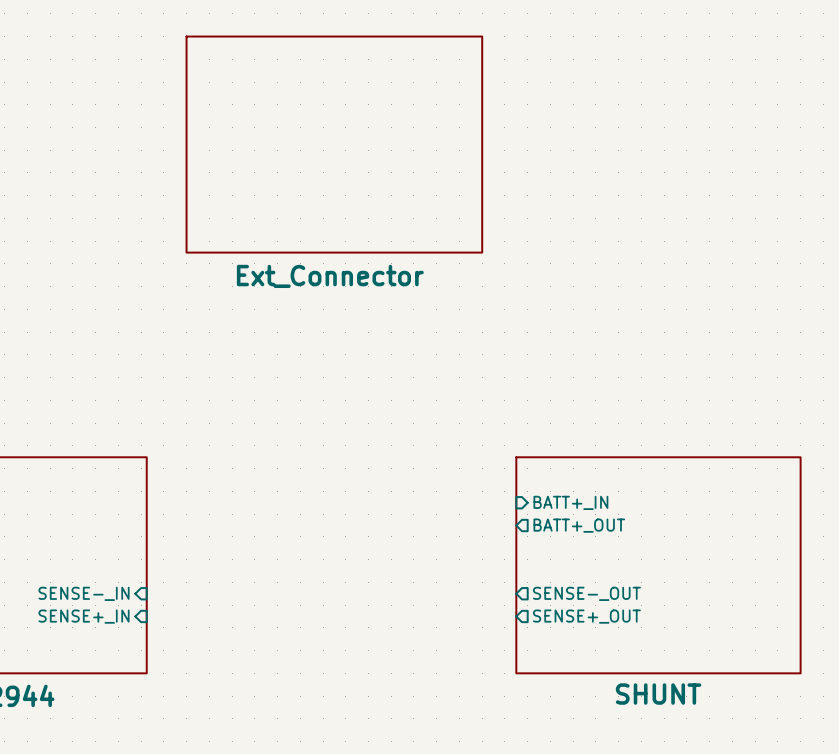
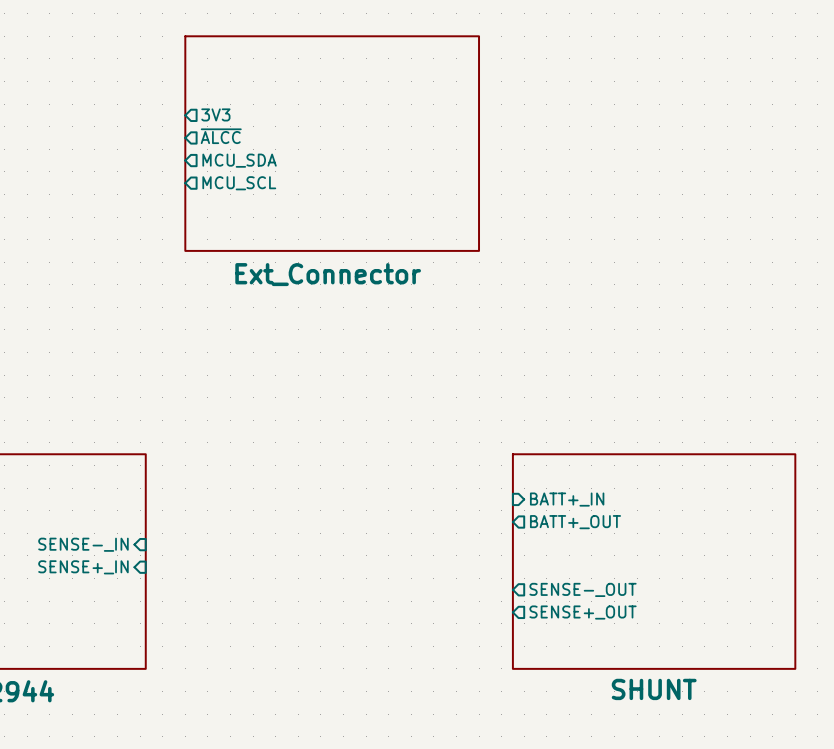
sheet pin: none -> 3V3 (215, 114)
sheet pin: none -> ~{ALCC} (221, 136)
sheet pin: none -> MCU_SDA (239, 160)
sheet pin: none -> MCU_SCL (239, 183)
sheet pin position: SENSE-_IN (84, 593) -> SENSE-_IN (83, 544)
sheet pin position: SENSE+_IN (84, 616) -> SENSE+_IN (83, 567)

